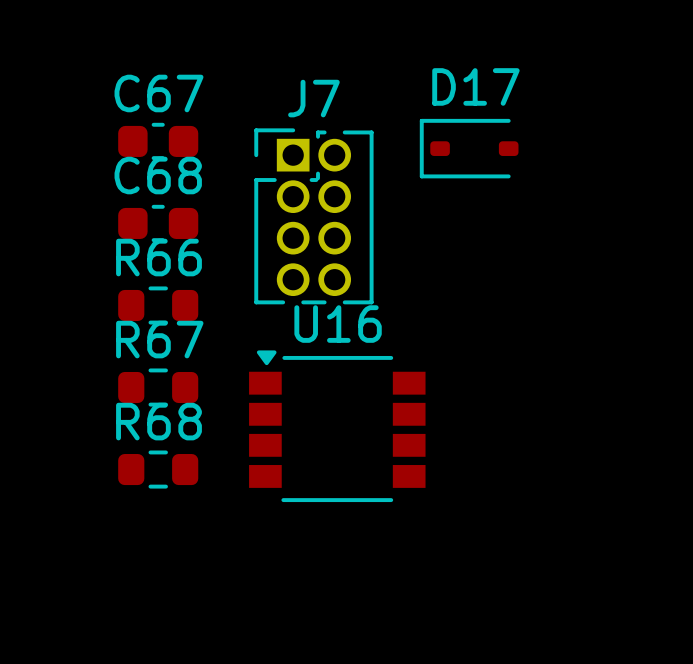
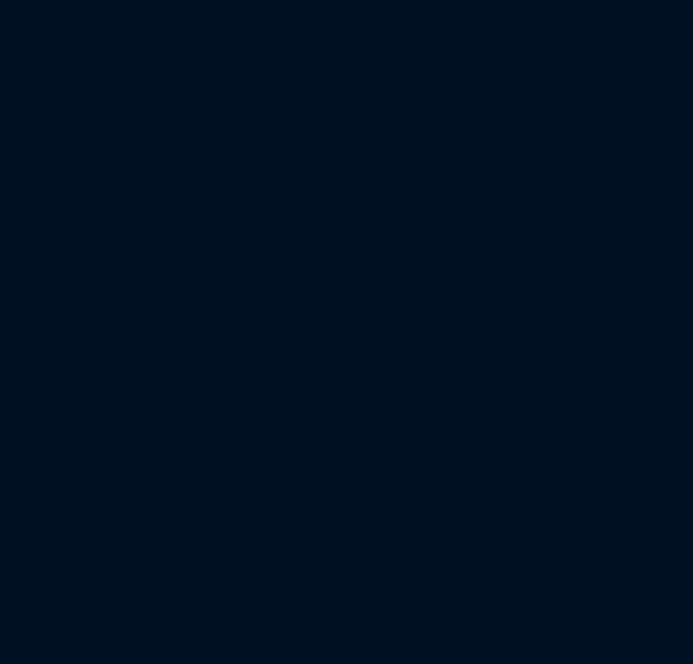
C67: (158, 141) -> none
D17: (469, 148) -> none
J7: (313, 216) -> none
C68: (158, 223) -> none
R66: (158, 305) -> none
R67: (158, 387) -> none
U16: (337, 426) -> none
R68: (158, 469) -> none

